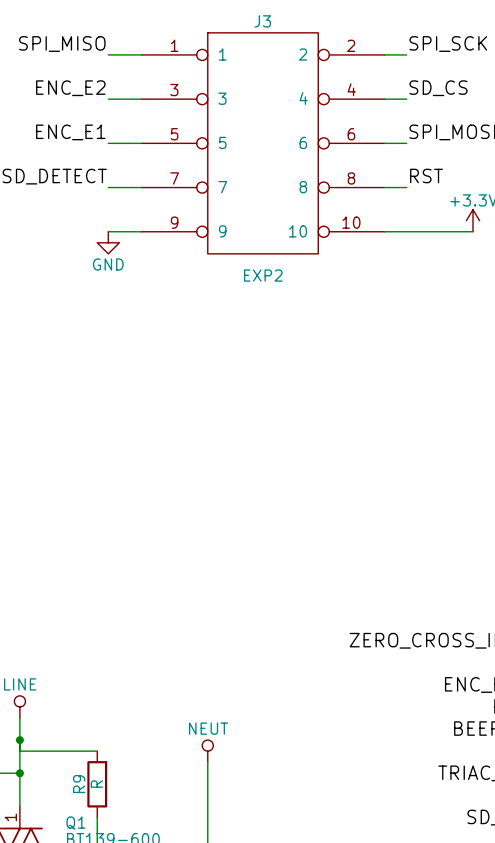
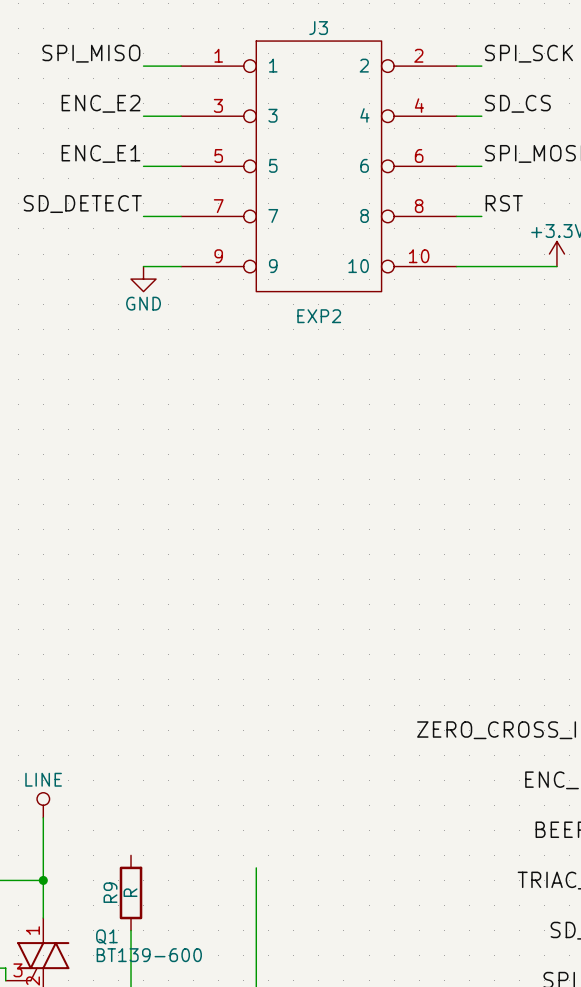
junction: (19, 740) -> none
wire: (19, 751) (97, 751) -> none
power symbol: NEUT (207, 751) -> none

